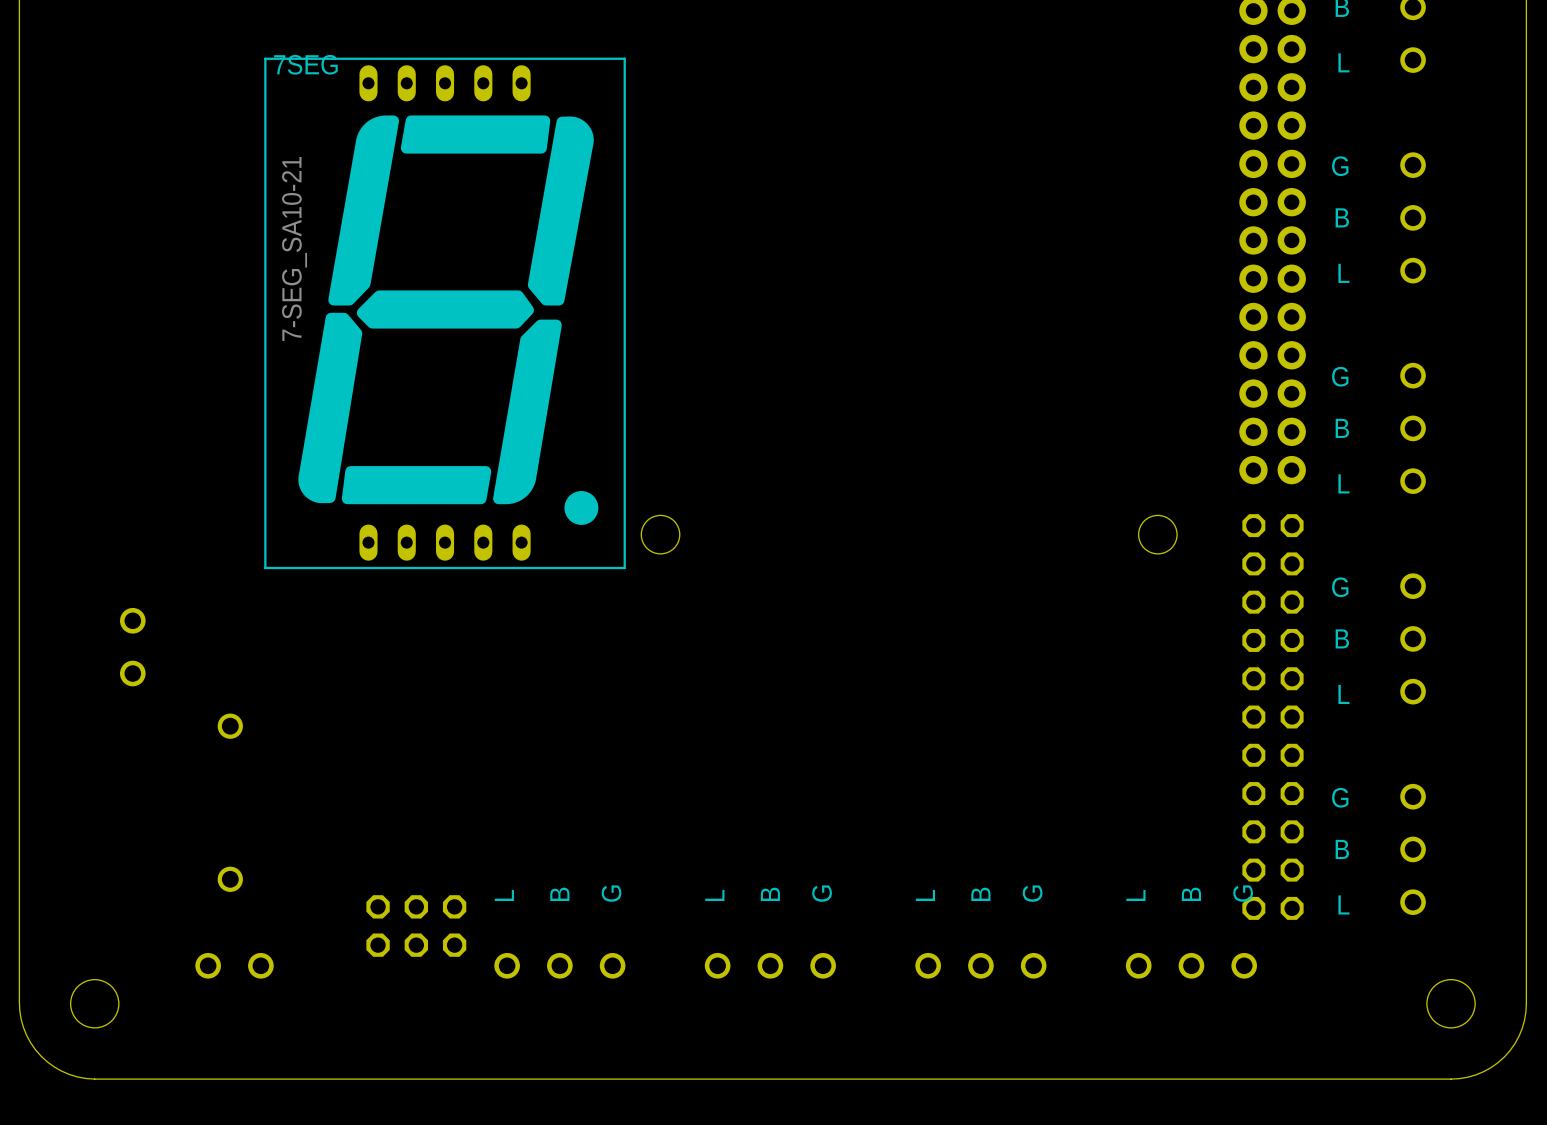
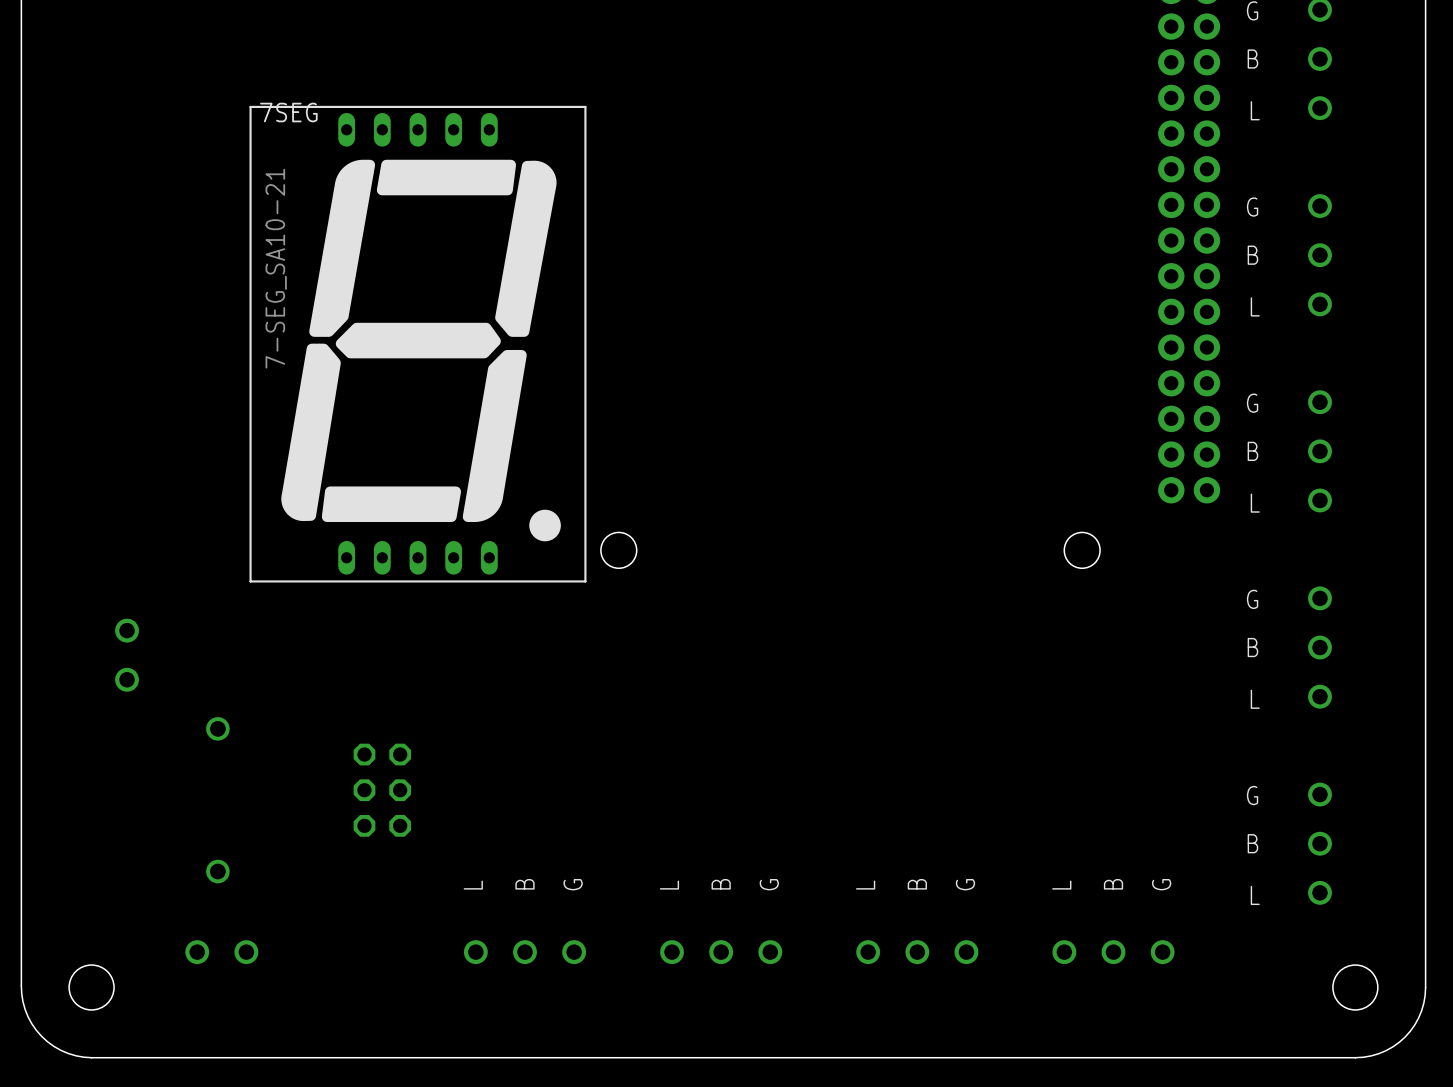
part: (1272, 717) -> none
part rotation: 0° (416, 926) -> 90° clockwise (382, 790)
part position: (416, 926) -> (382, 790)

